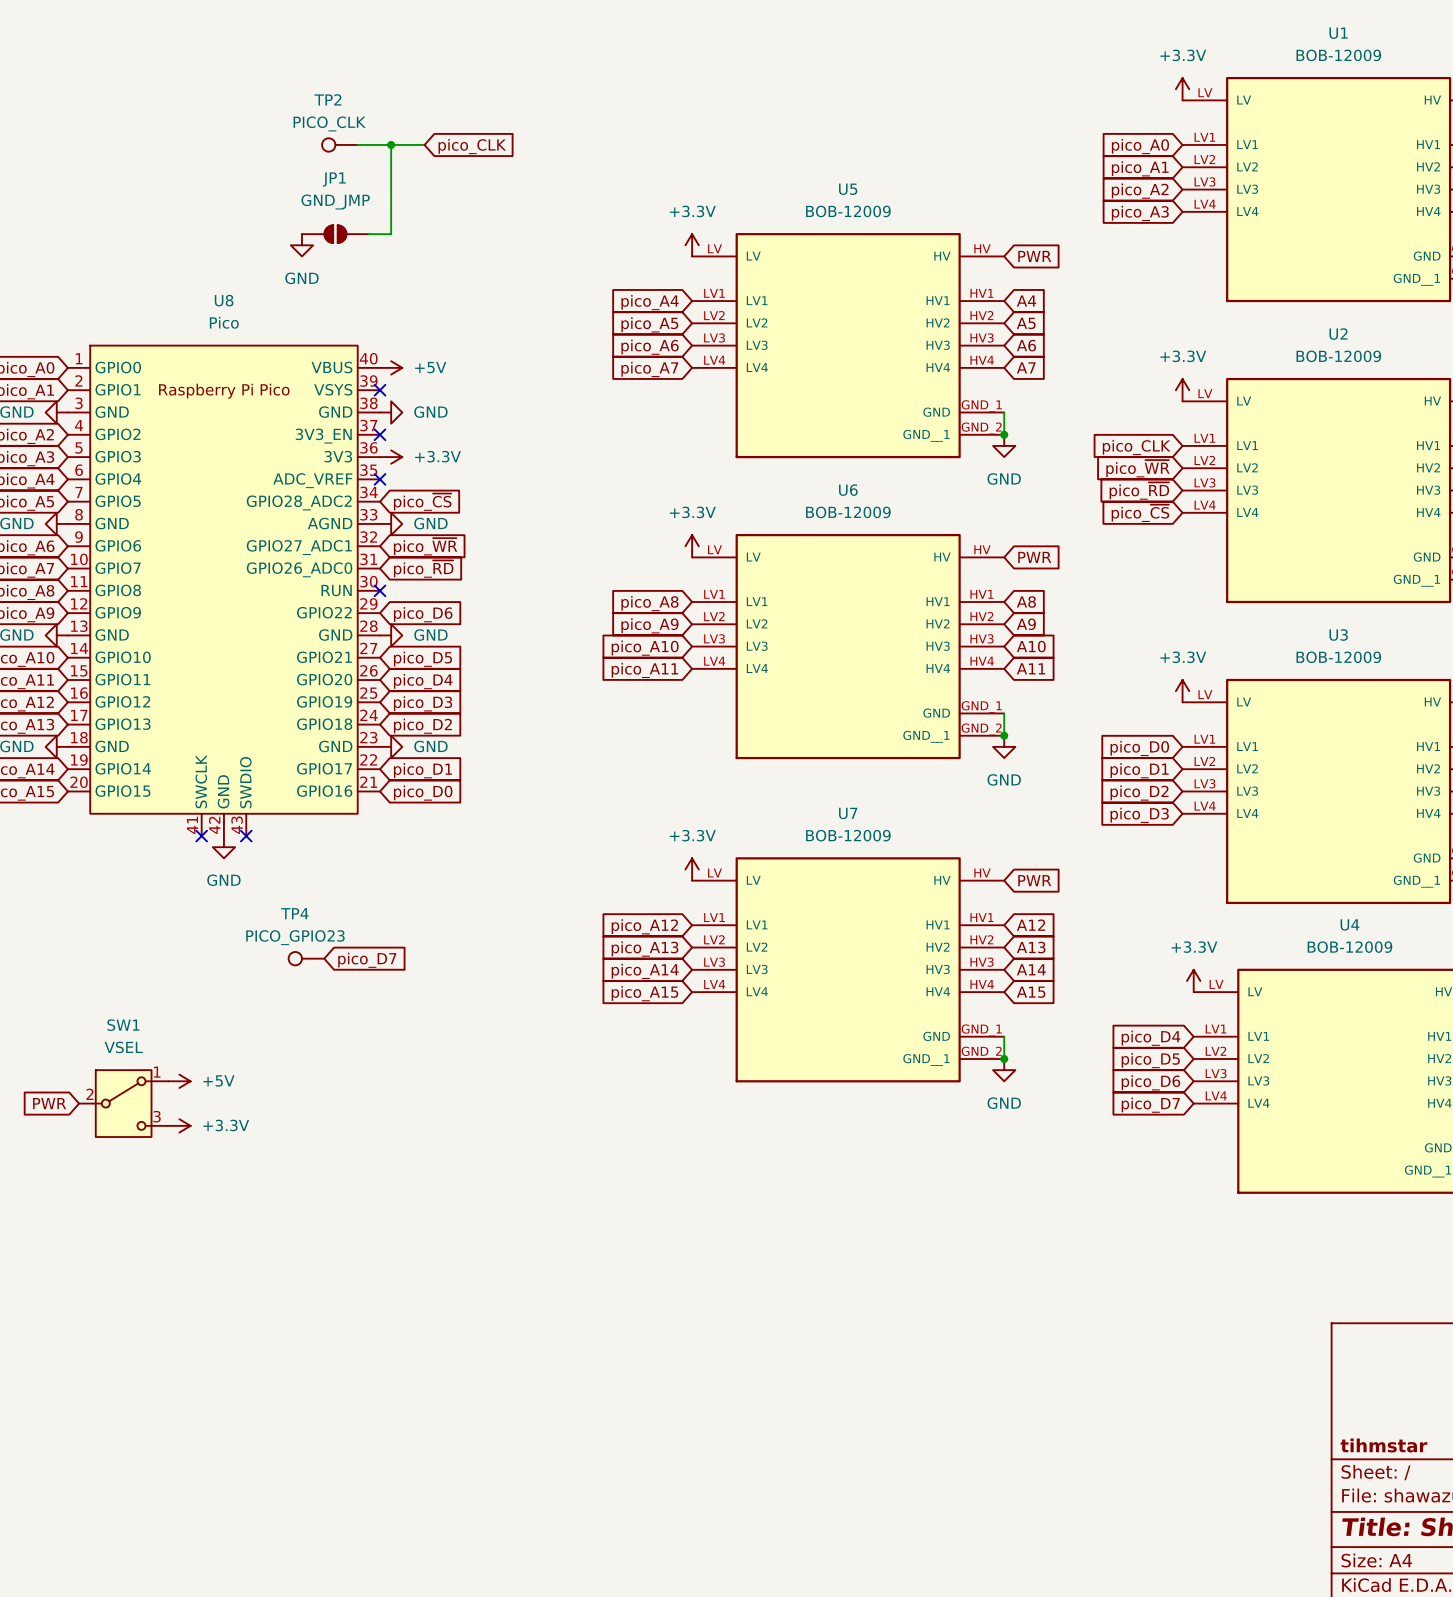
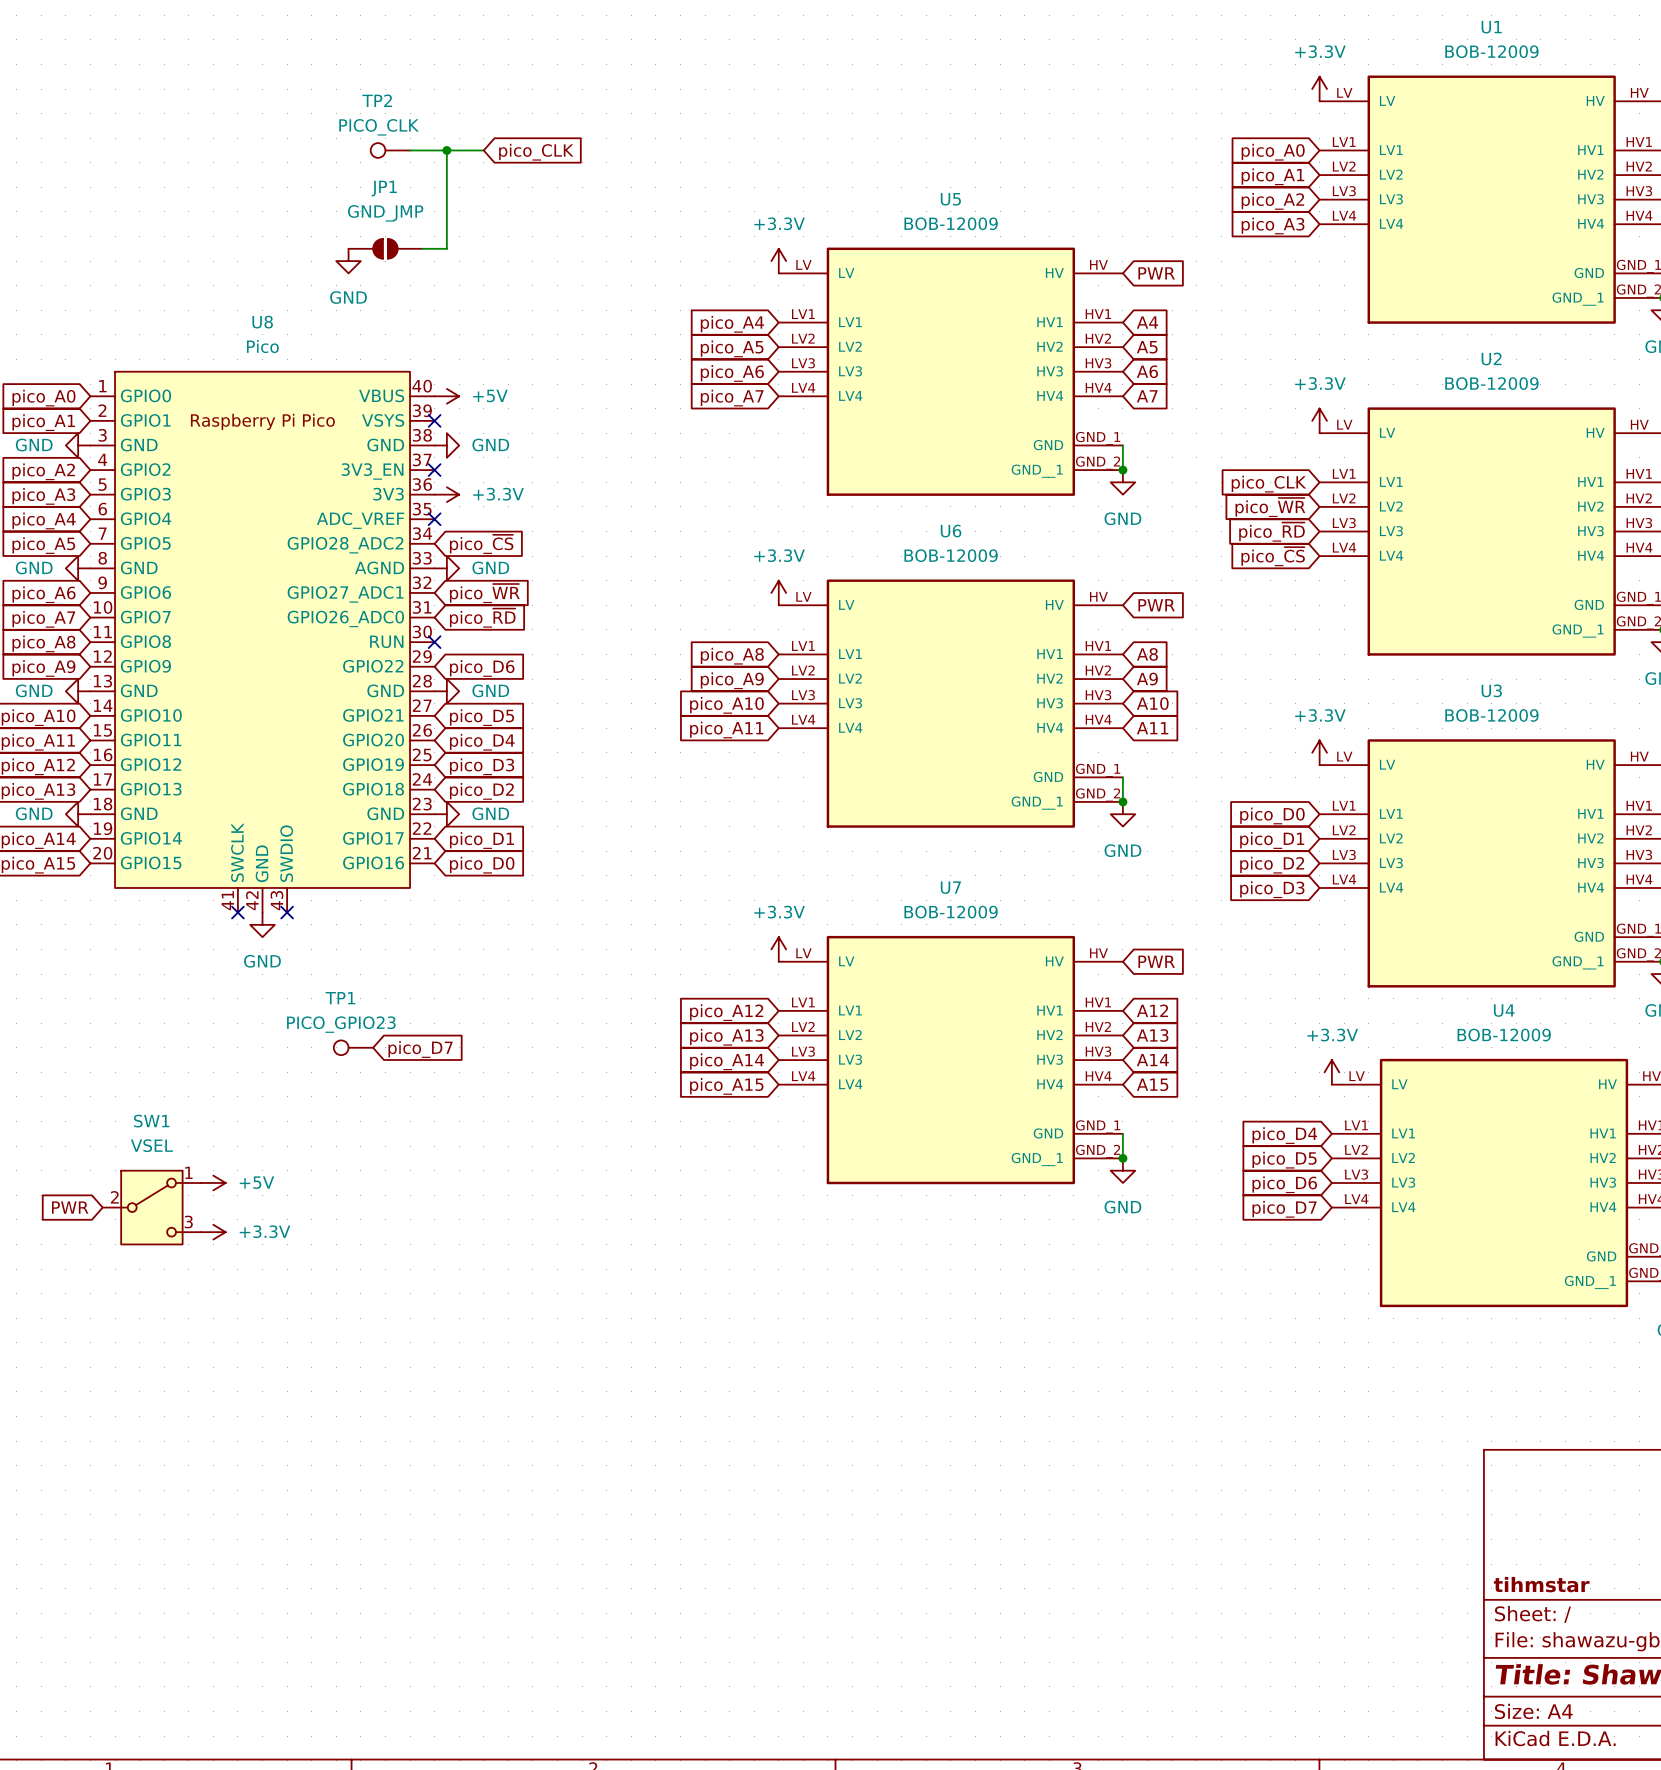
TP4 name: TP4 (294, 913) -> TP1 (340, 998)

